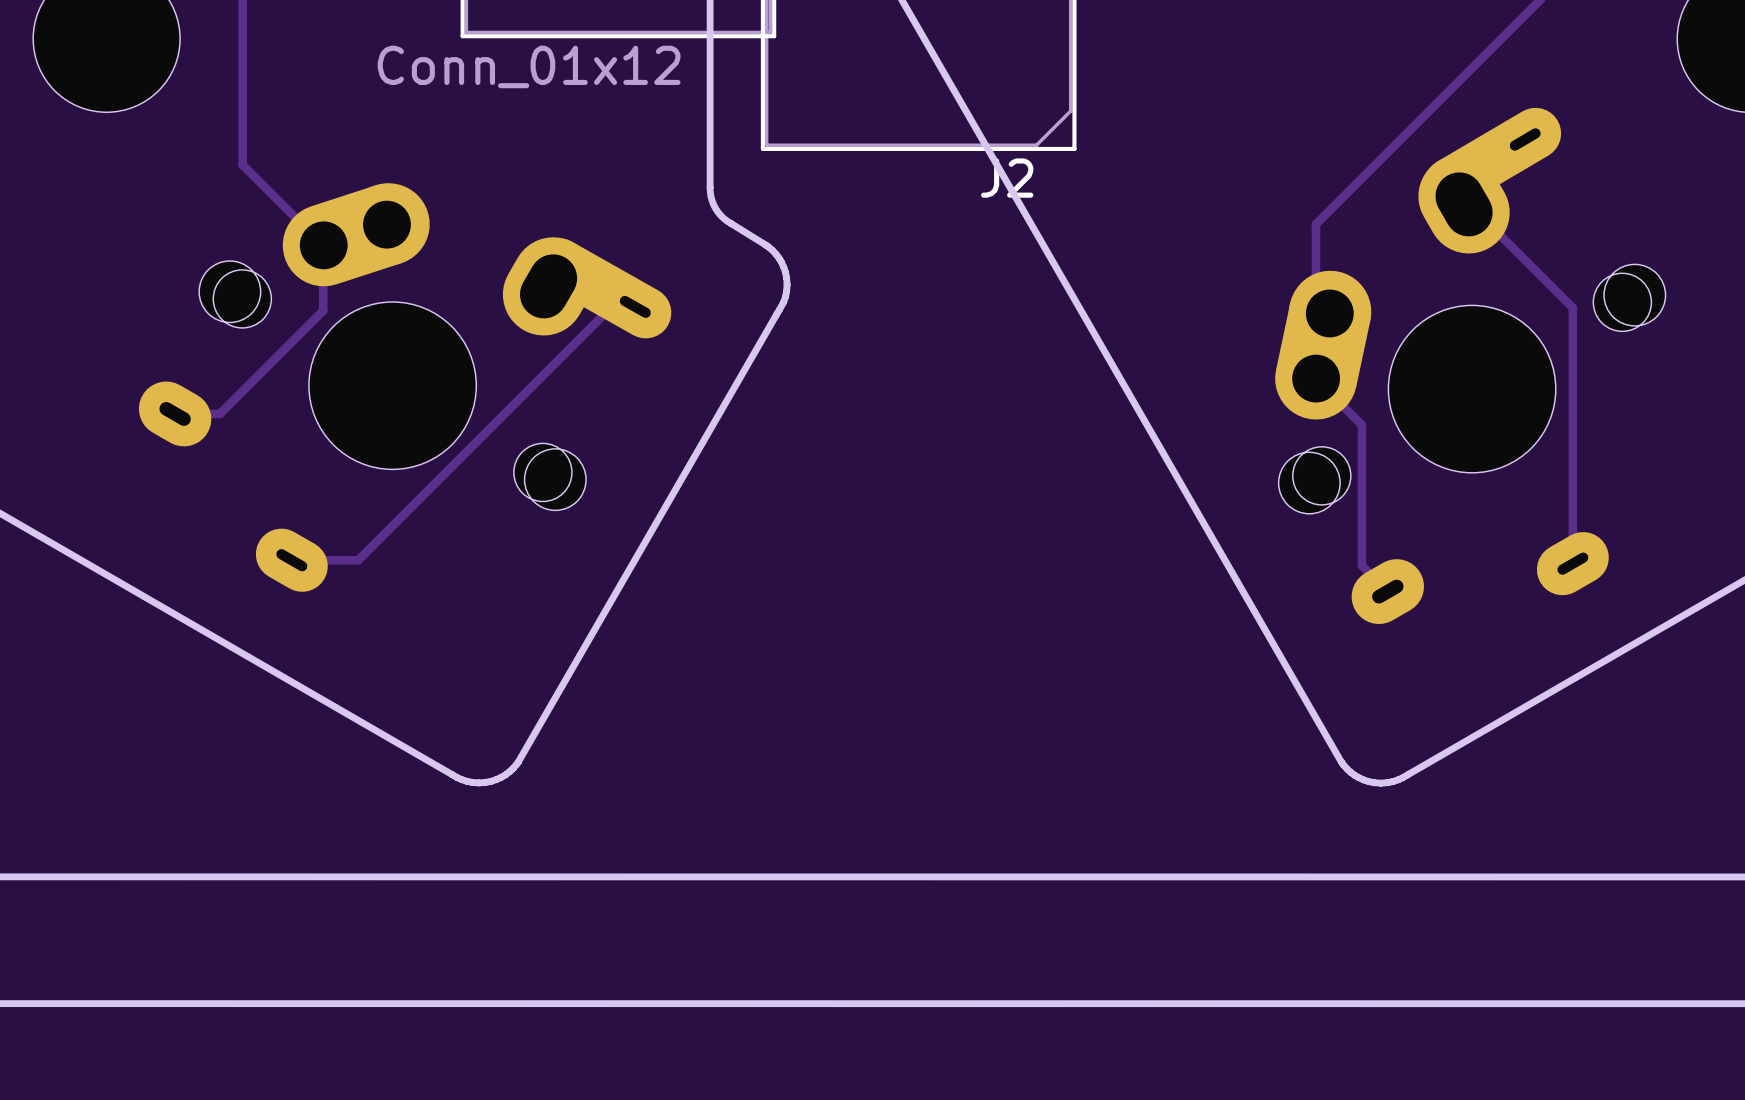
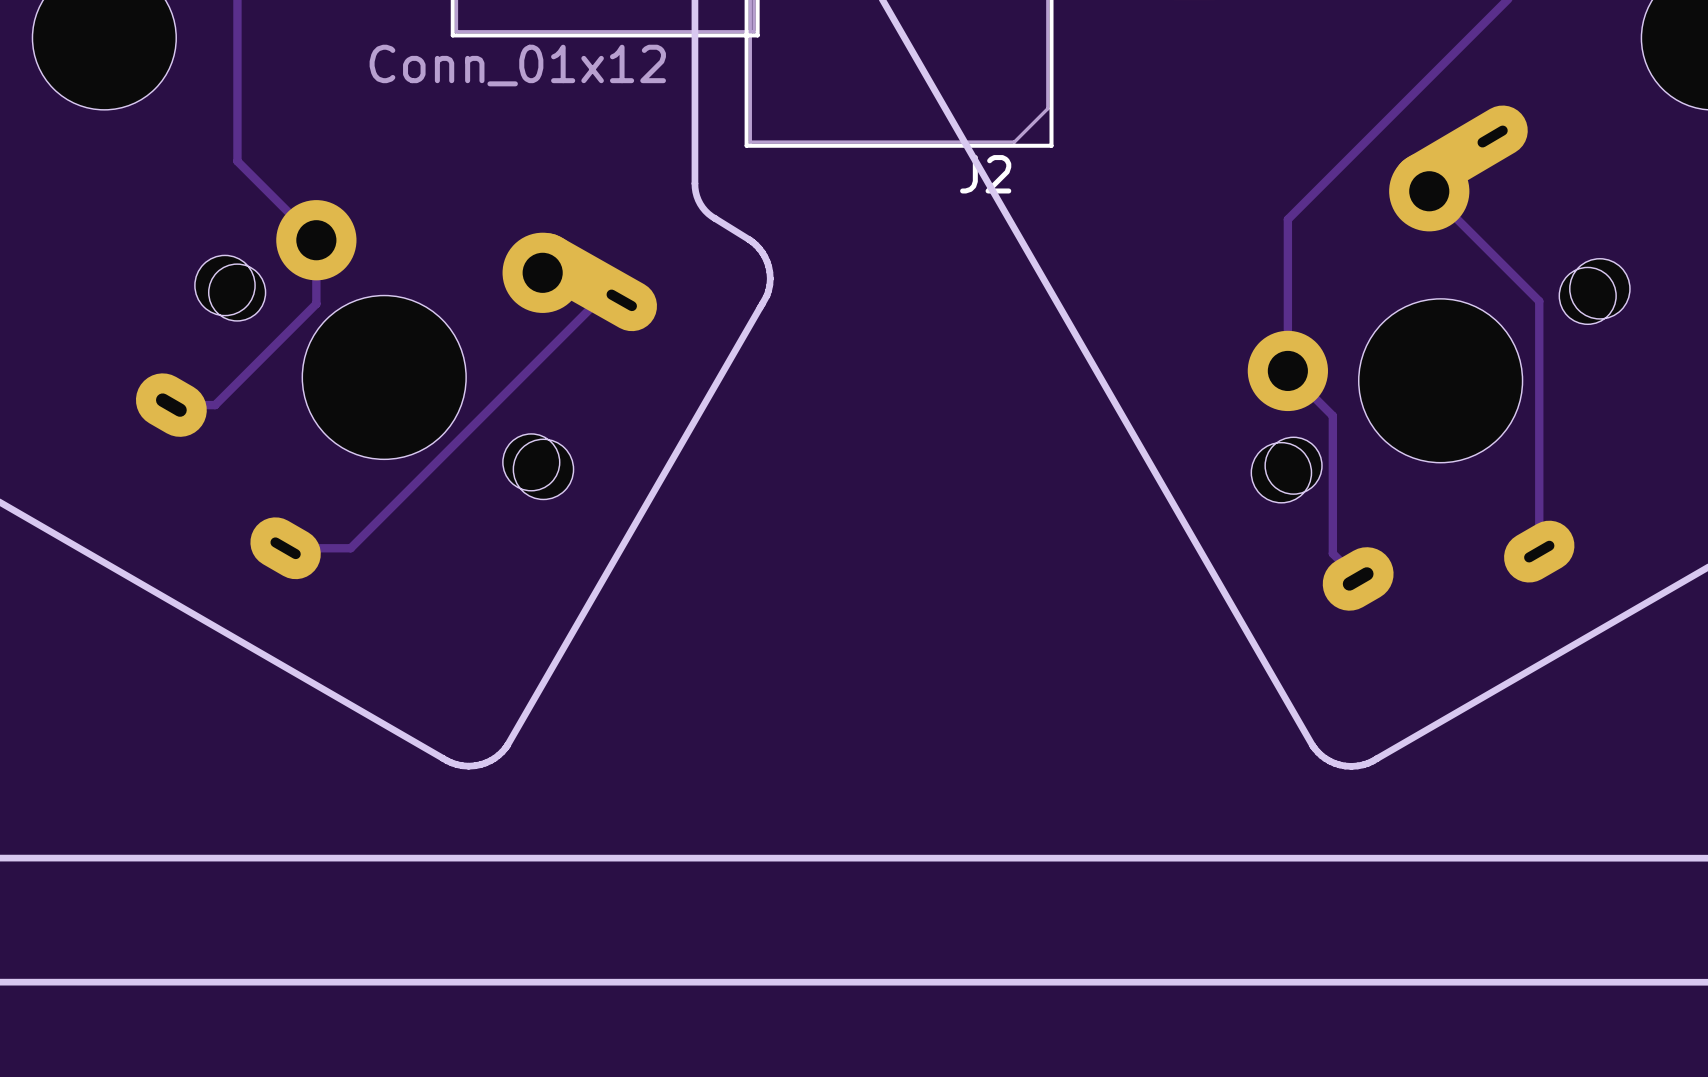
part footprint: [1275, 107, 1666, 625] -> [1247, 105, 1630, 611]
part footprint: [138, 183, 672, 592] -> [135, 200, 658, 580]

